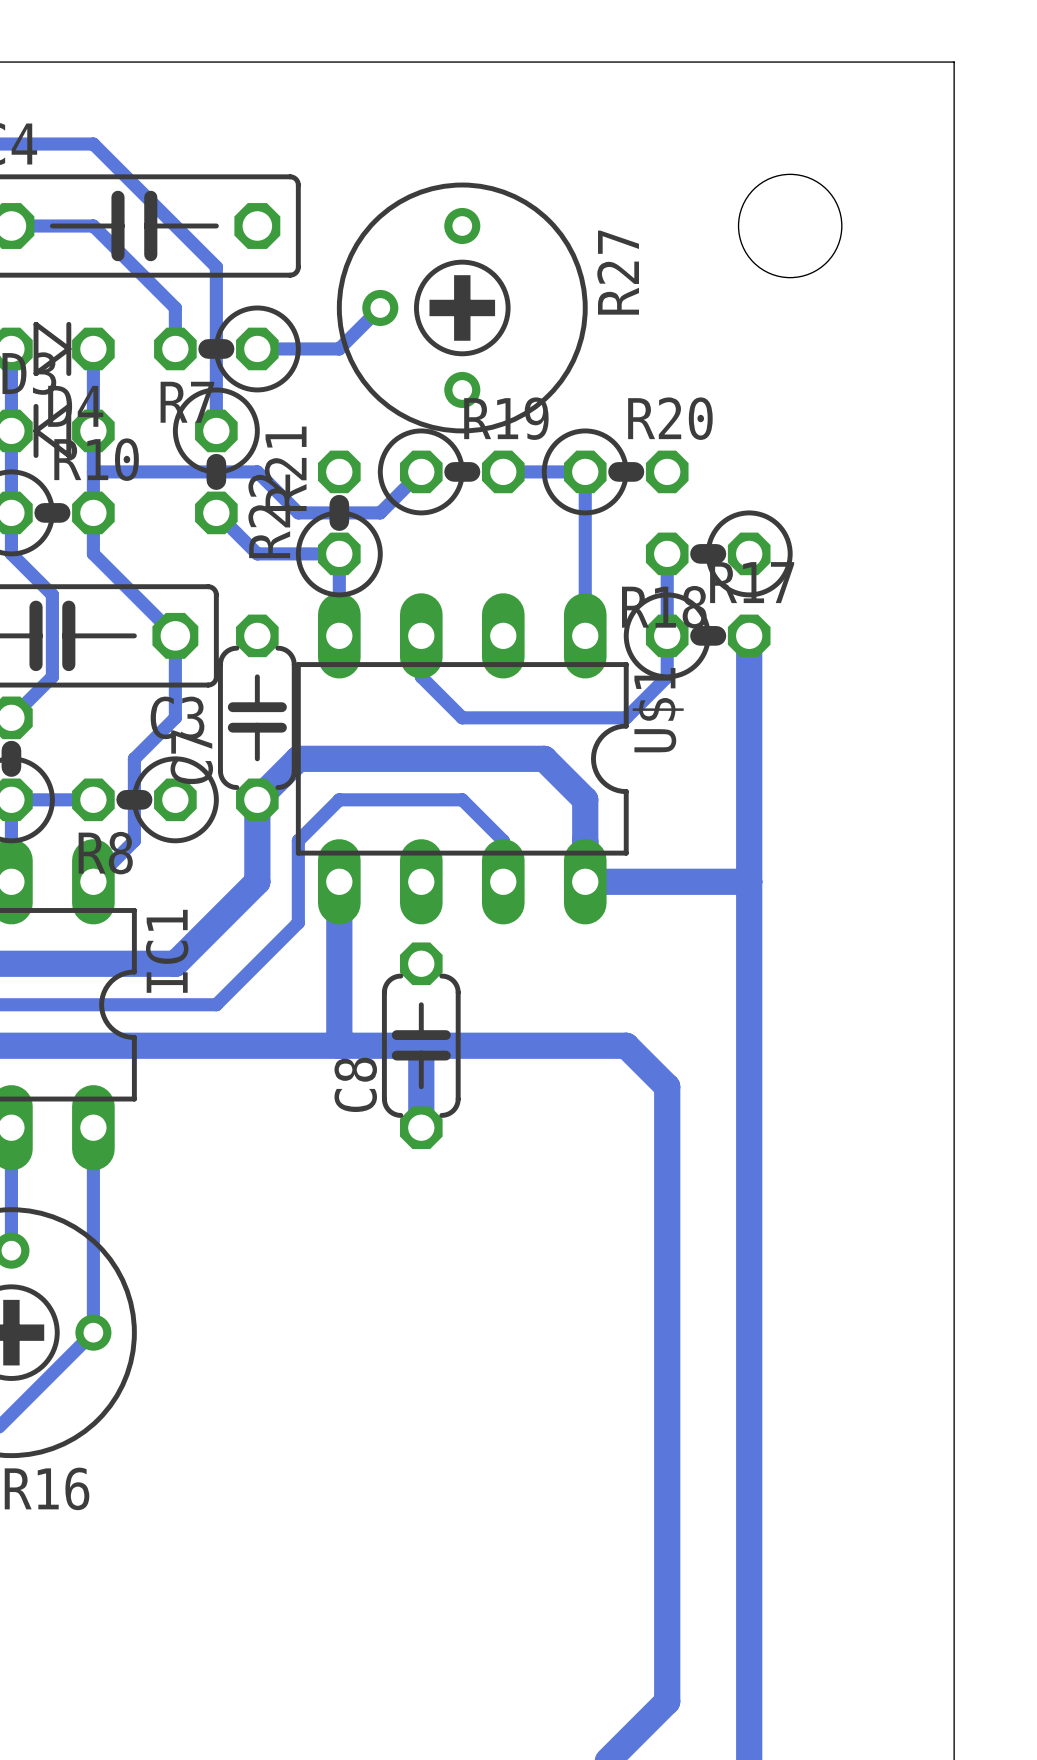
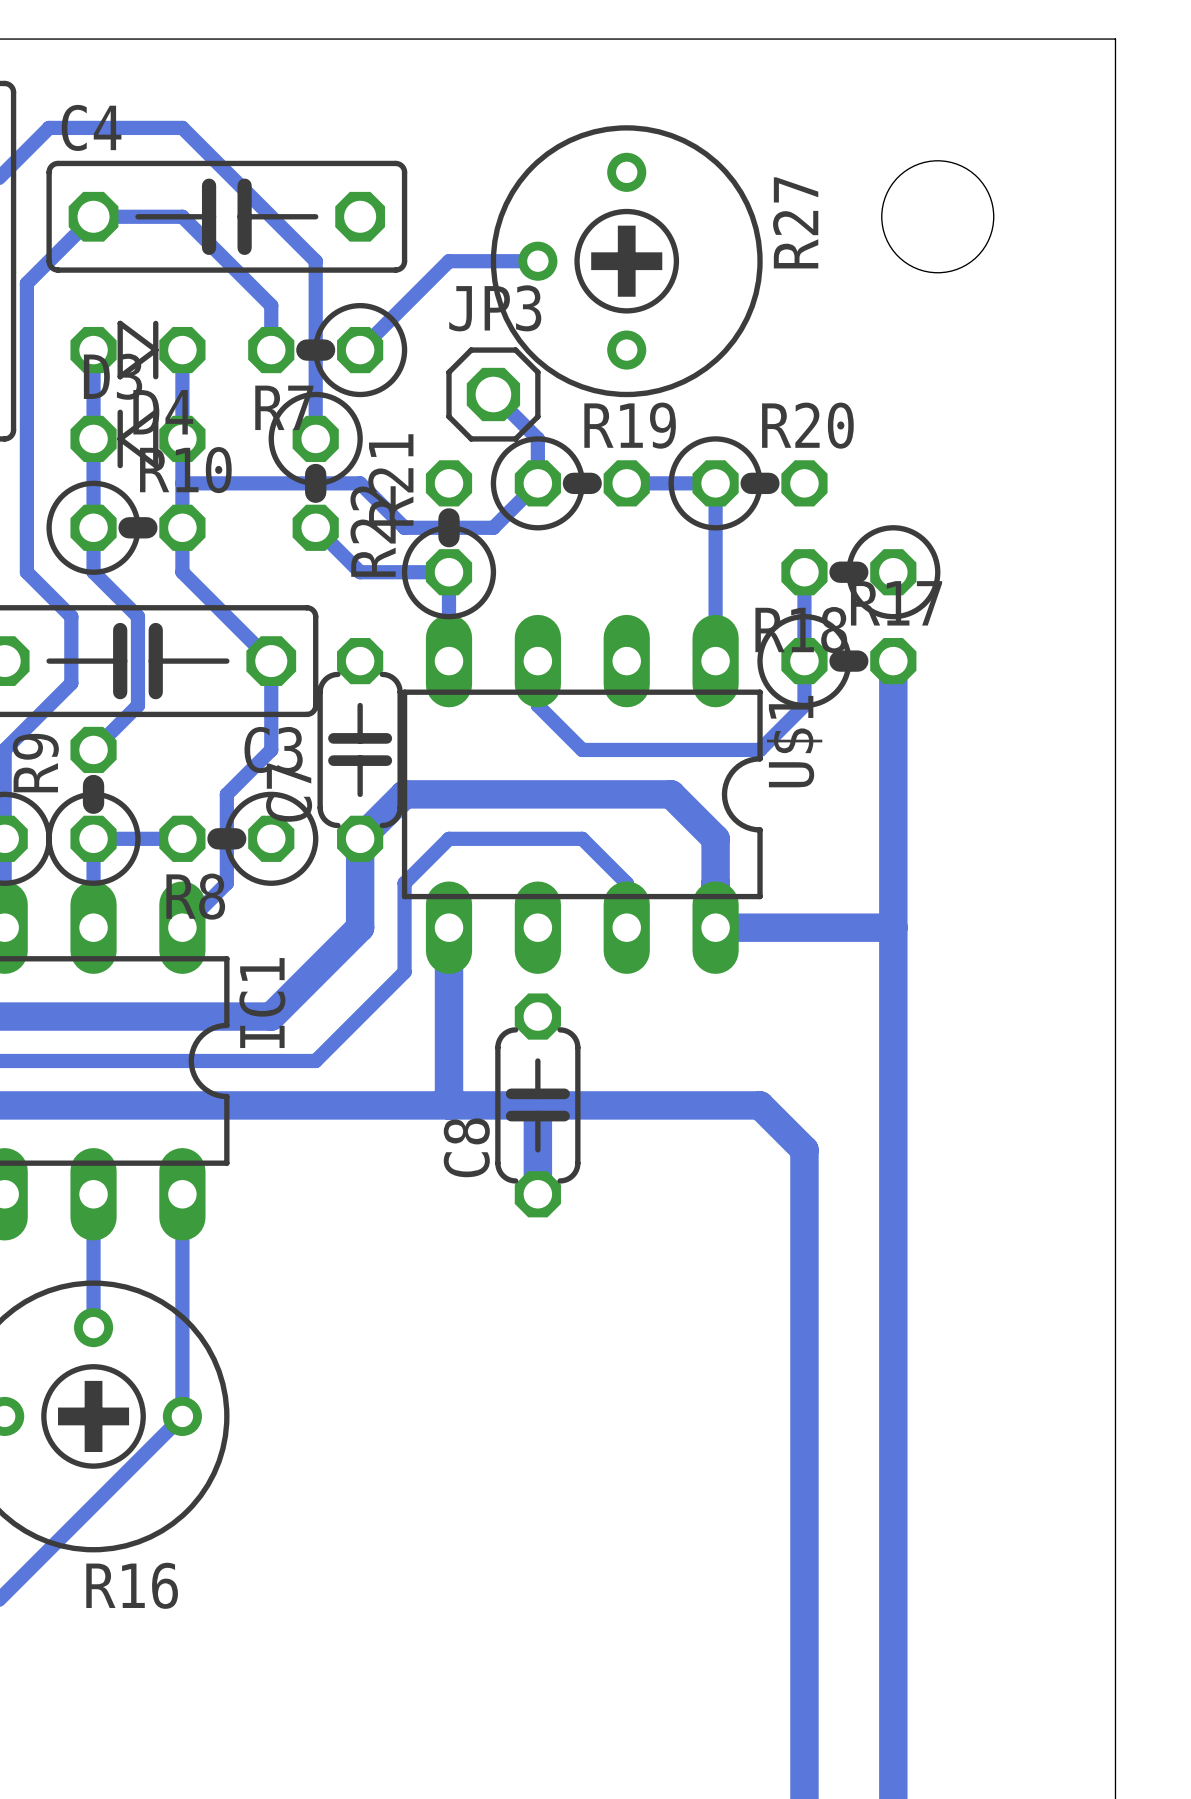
bottom track: (380, 307) (339, 348) (257, 348) -> (537, 261) (449, 261) (360, 350)
R27 position: (462, 307) -> (626, 261)
bottom track: none -> (493, 394) (537, 438) (537, 483)
JP3: none -> (493, 394)

